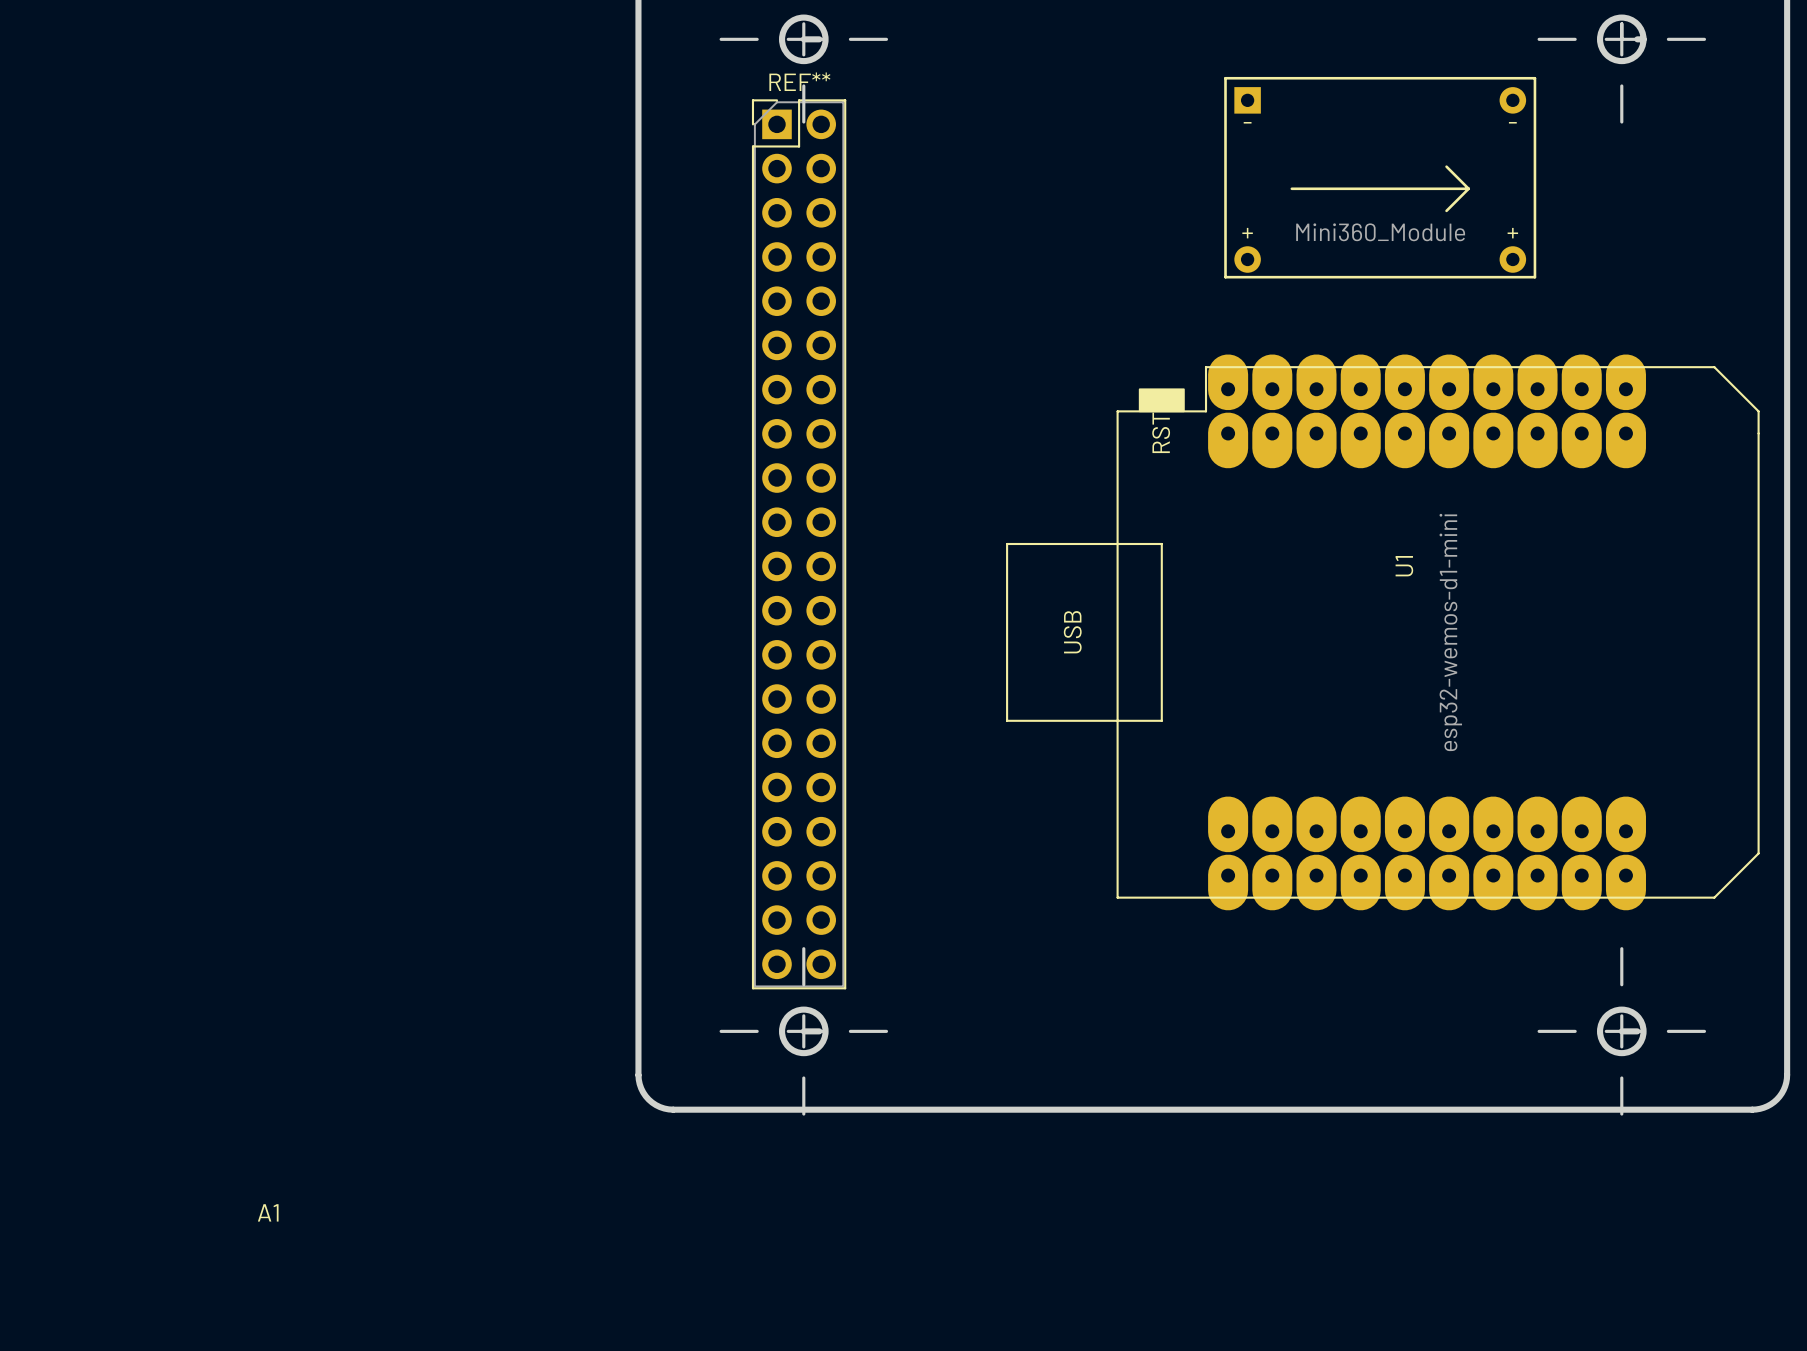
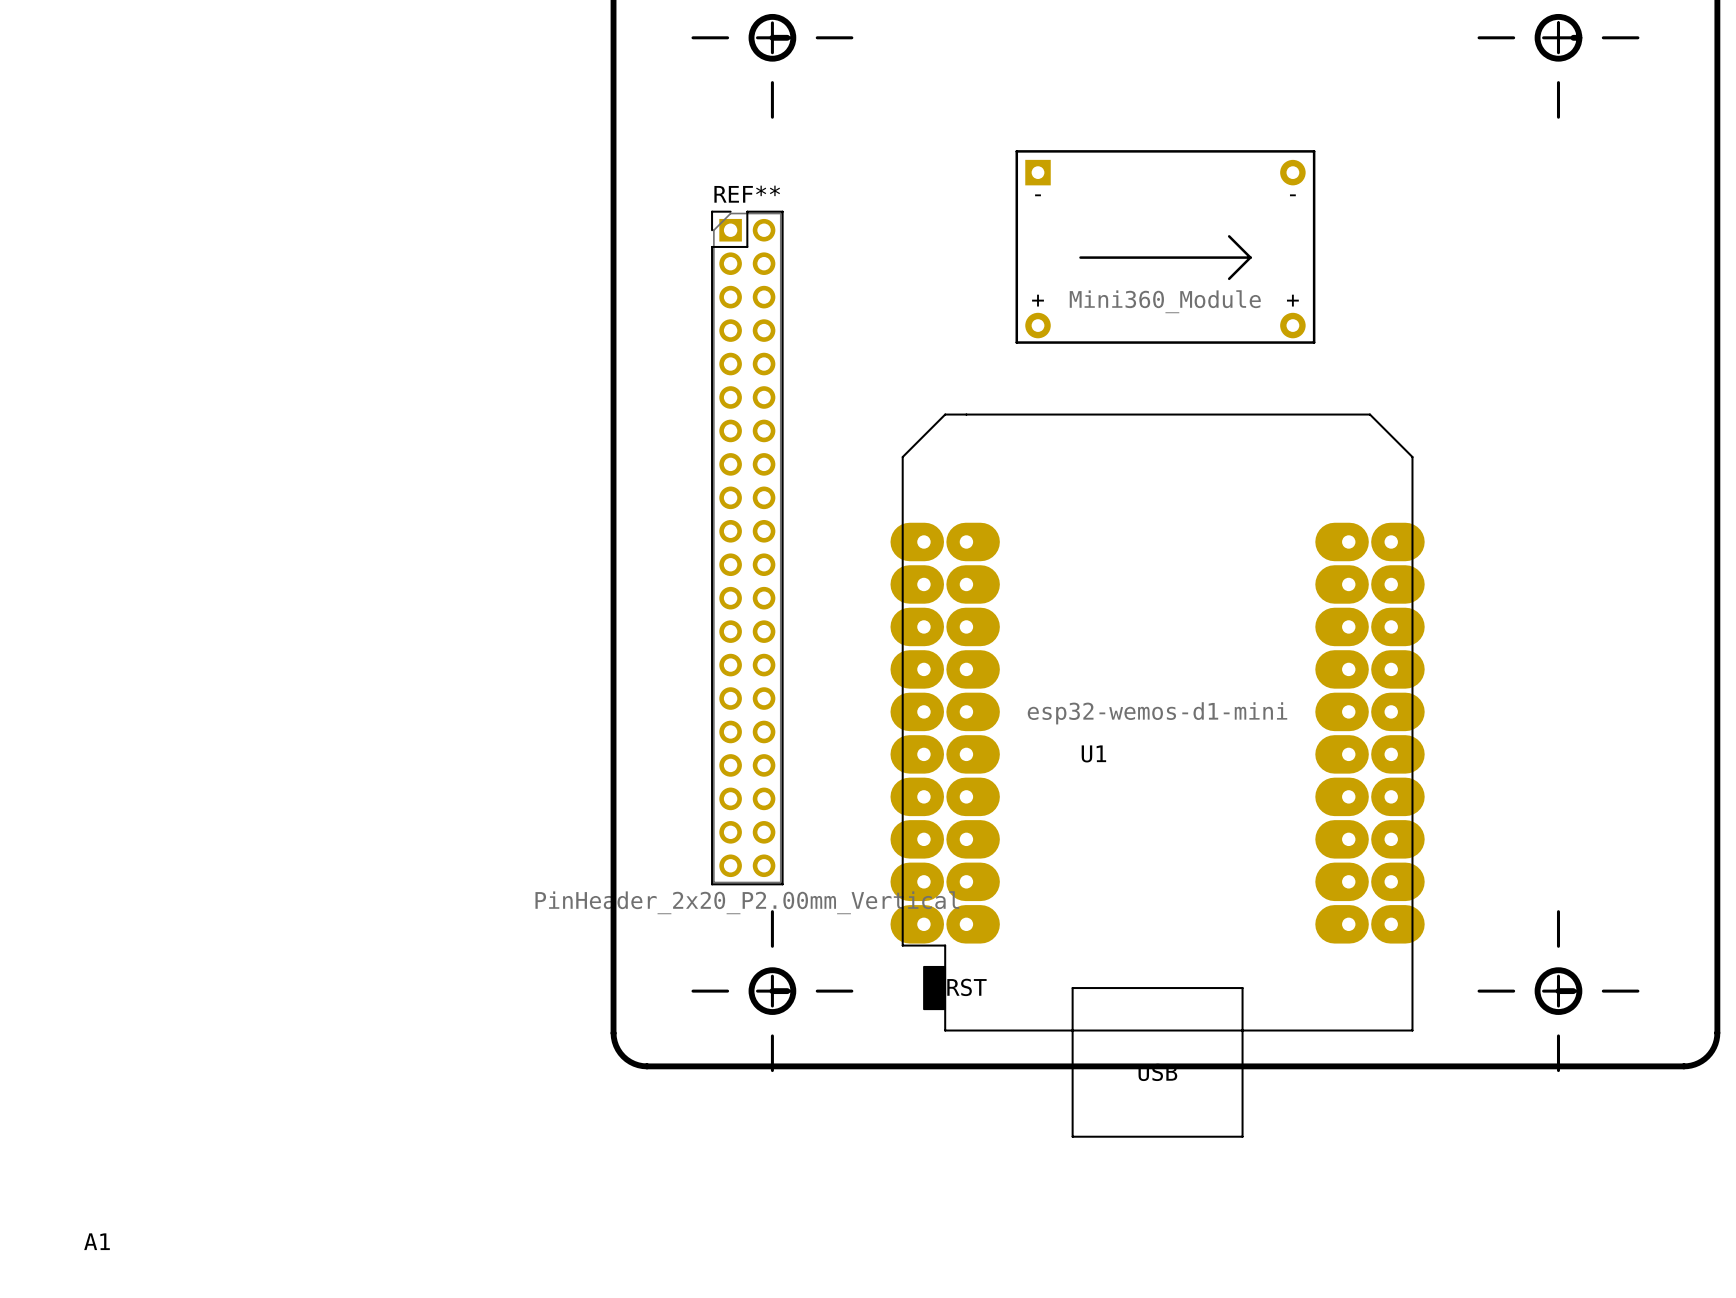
A1 position: (1380, 177) -> (1165, 246)
REF**: (799, 544) -> none
REF**: none -> PinHeader_2x20_P2.00mm_Vertical (747, 548)
U1 rotation: 0° (1382, 632) -> 90° counterclockwise (1157, 775)

